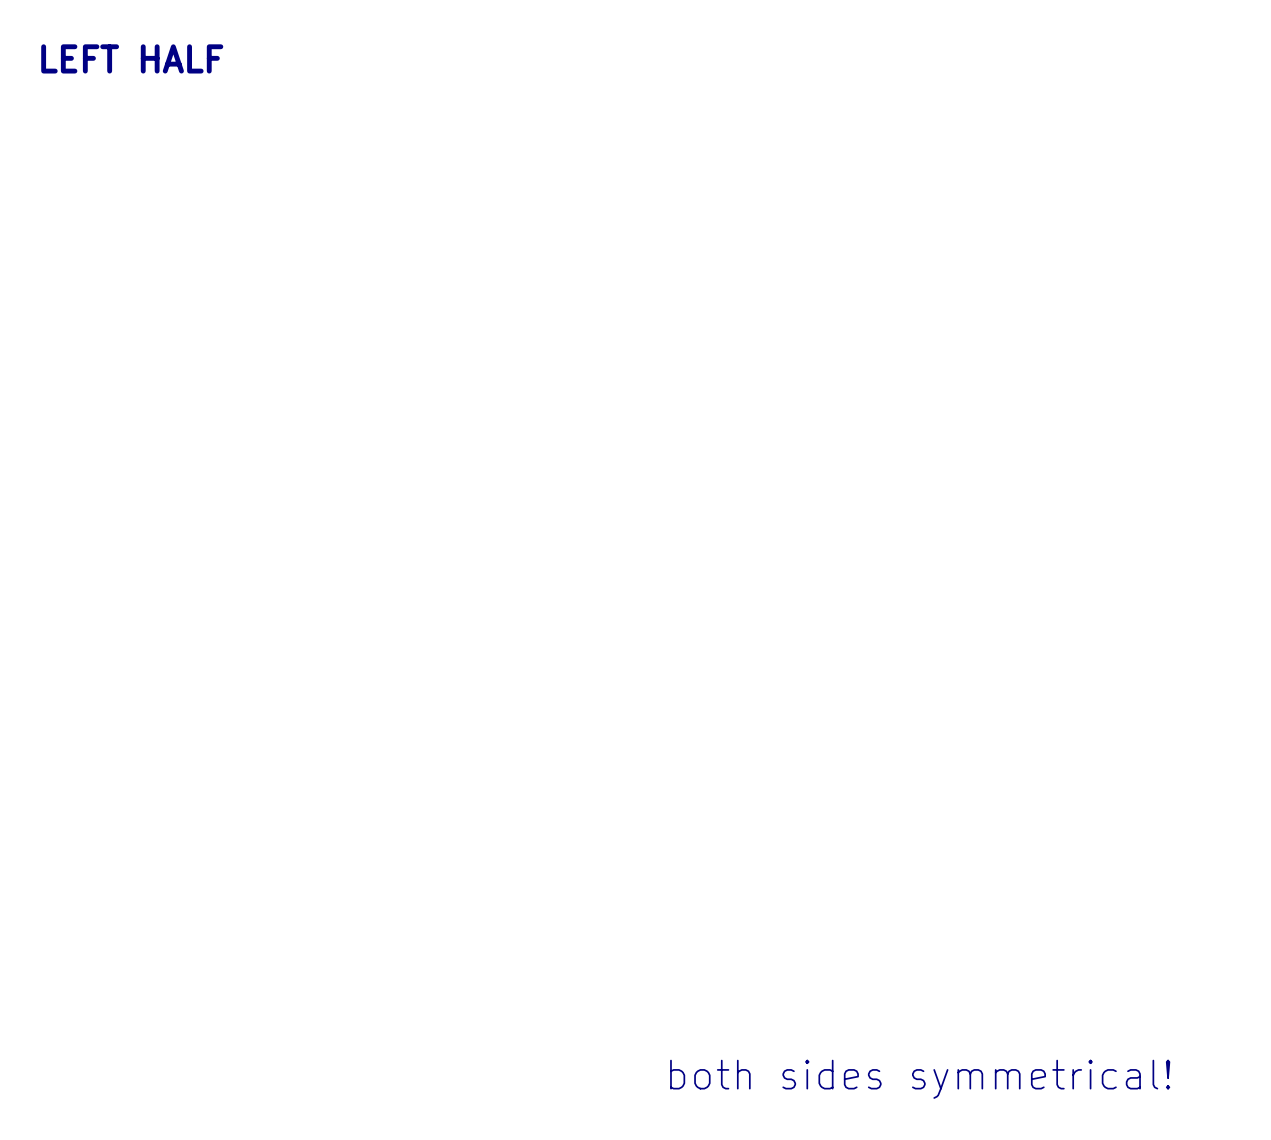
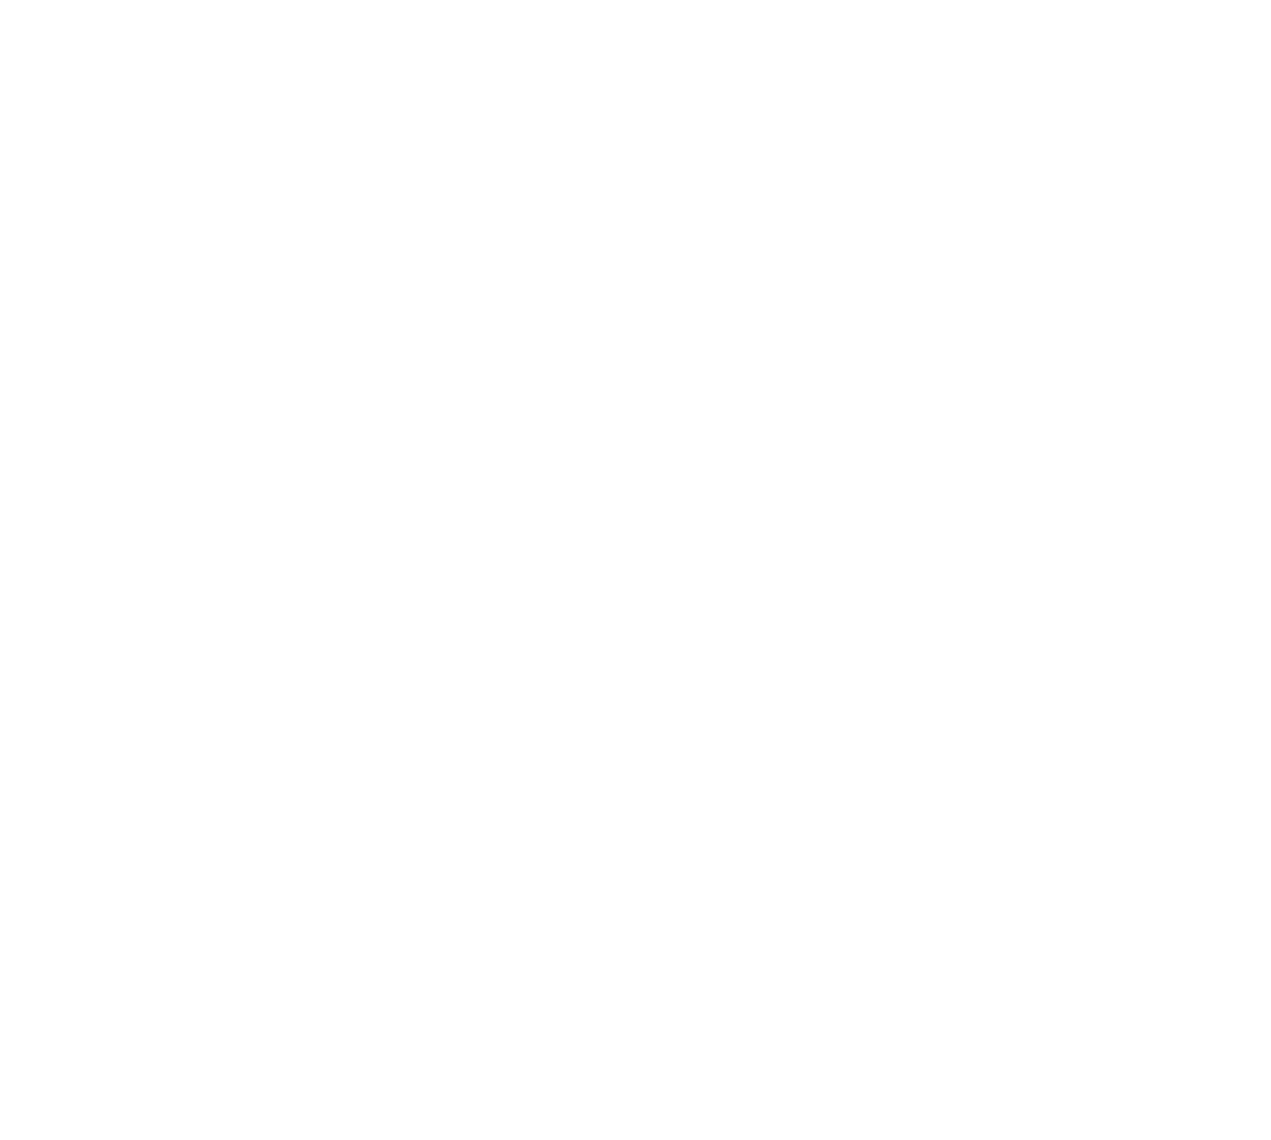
text: LEFT HALF (132, 58) -> none
text: both sides symmetrical! (920, 1079) -> none

